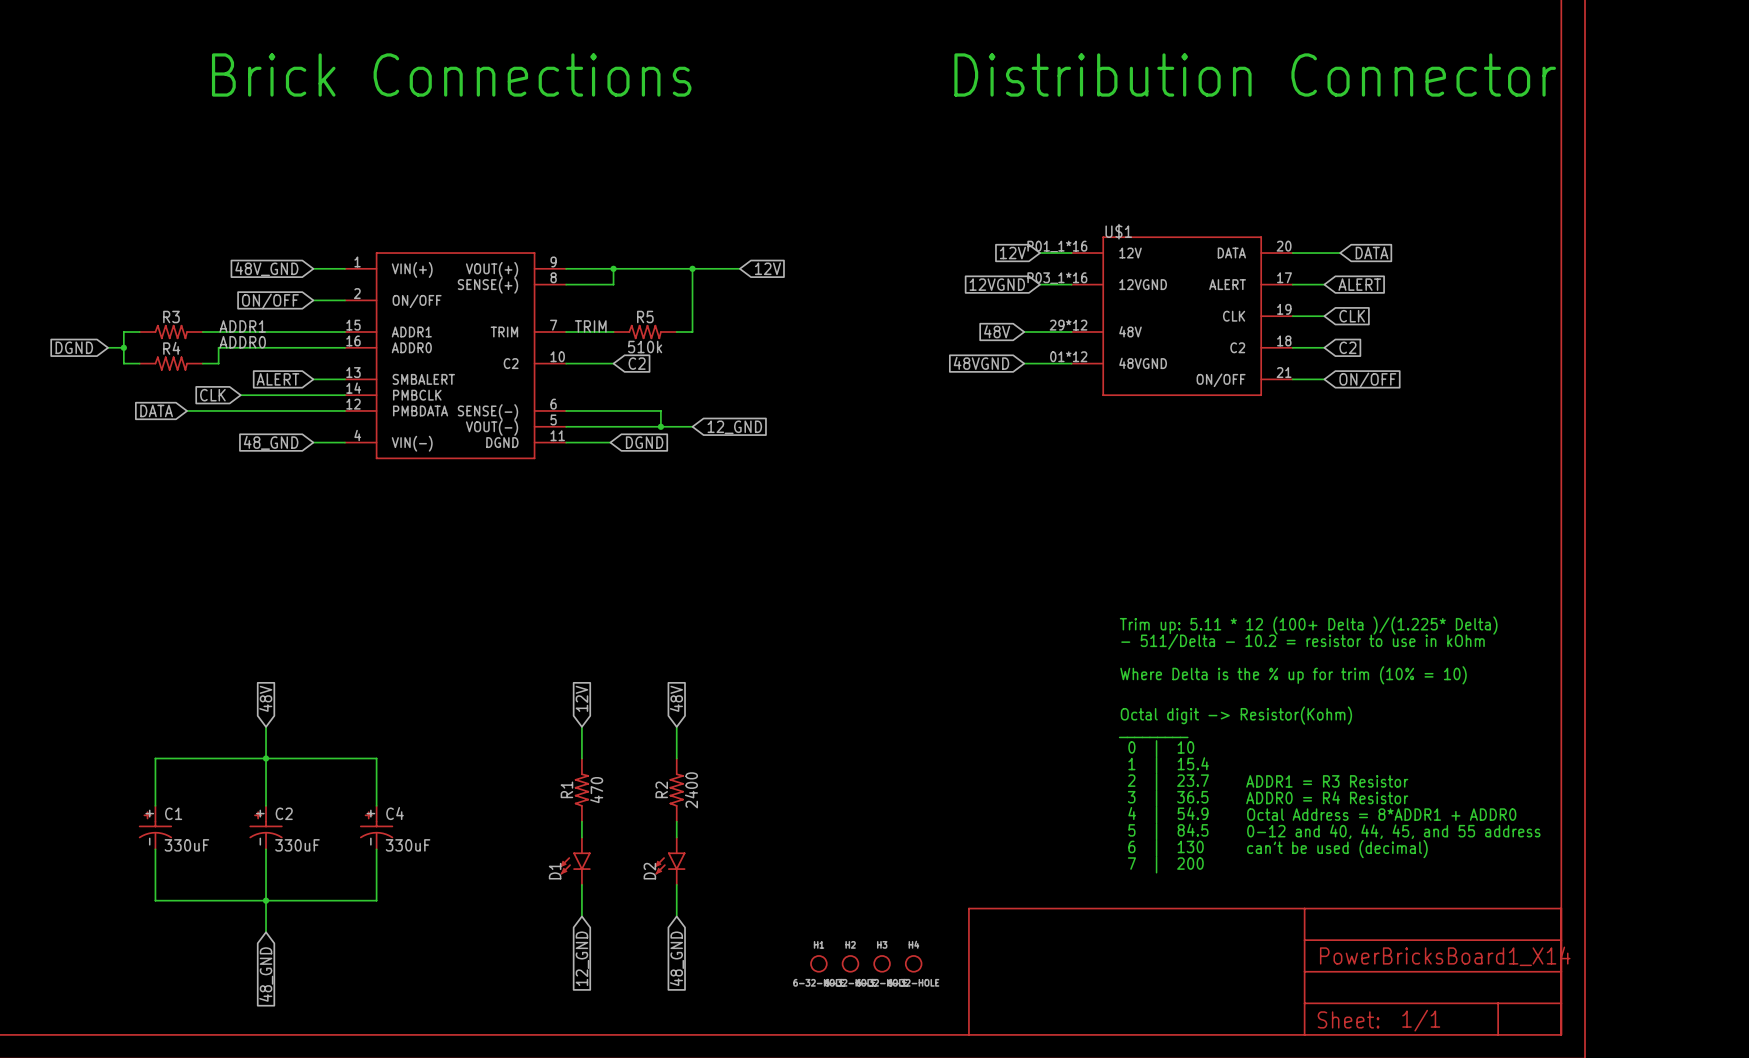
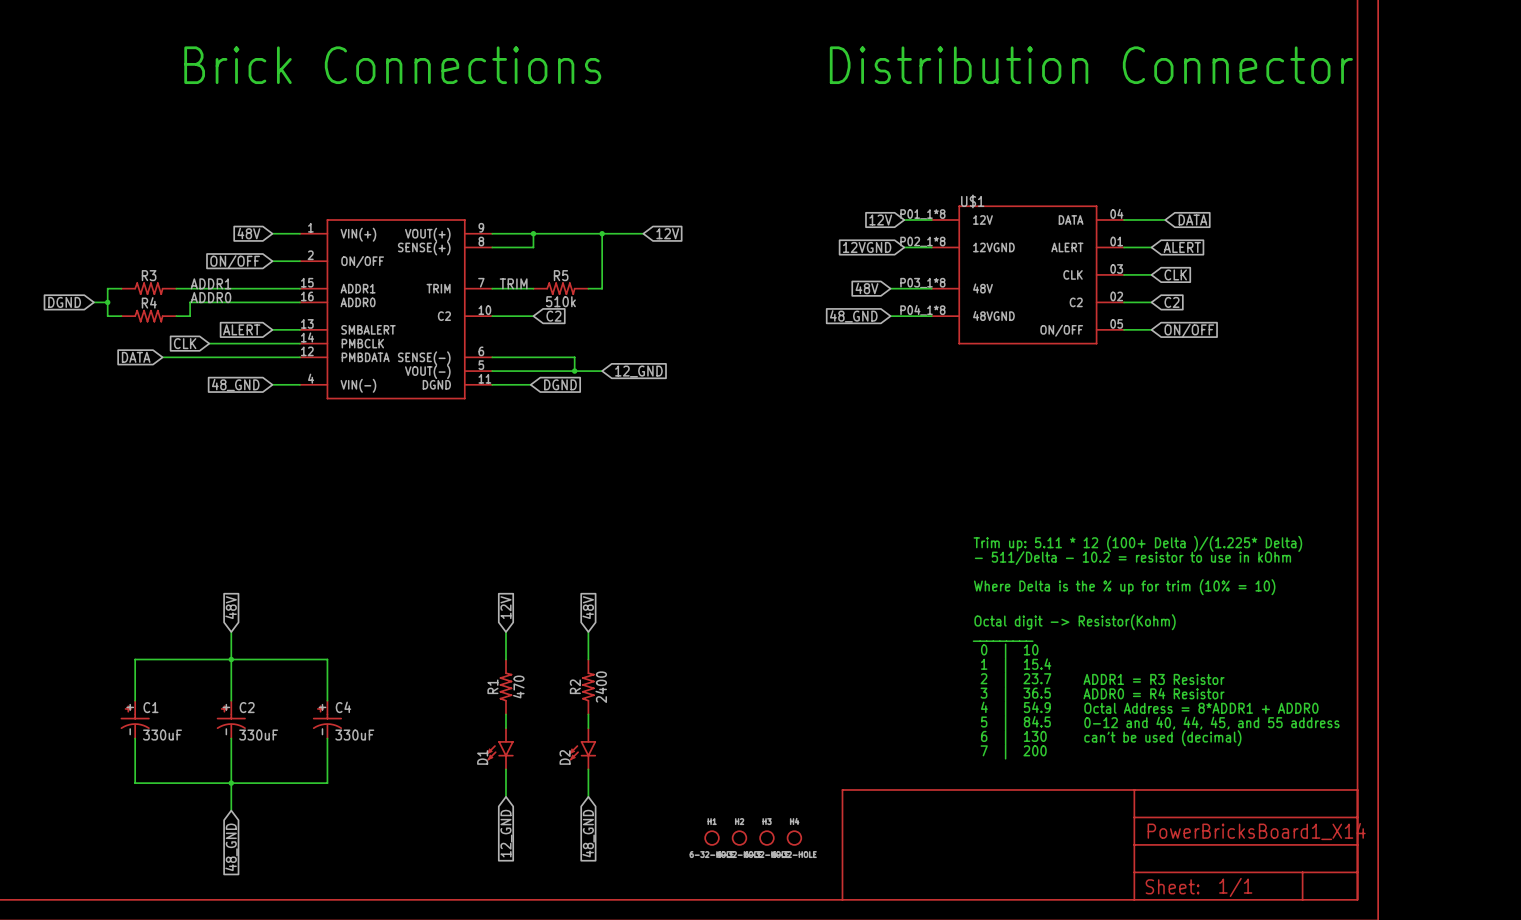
U$1 symbol: [1071, 236, 1293, 396] -> [931, 205, 1125, 345]
global label: 48V_GND (266, 269) -> 48V (248, 233)
global label: 48VGND (981, 363) -> 48_GND (853, 316)

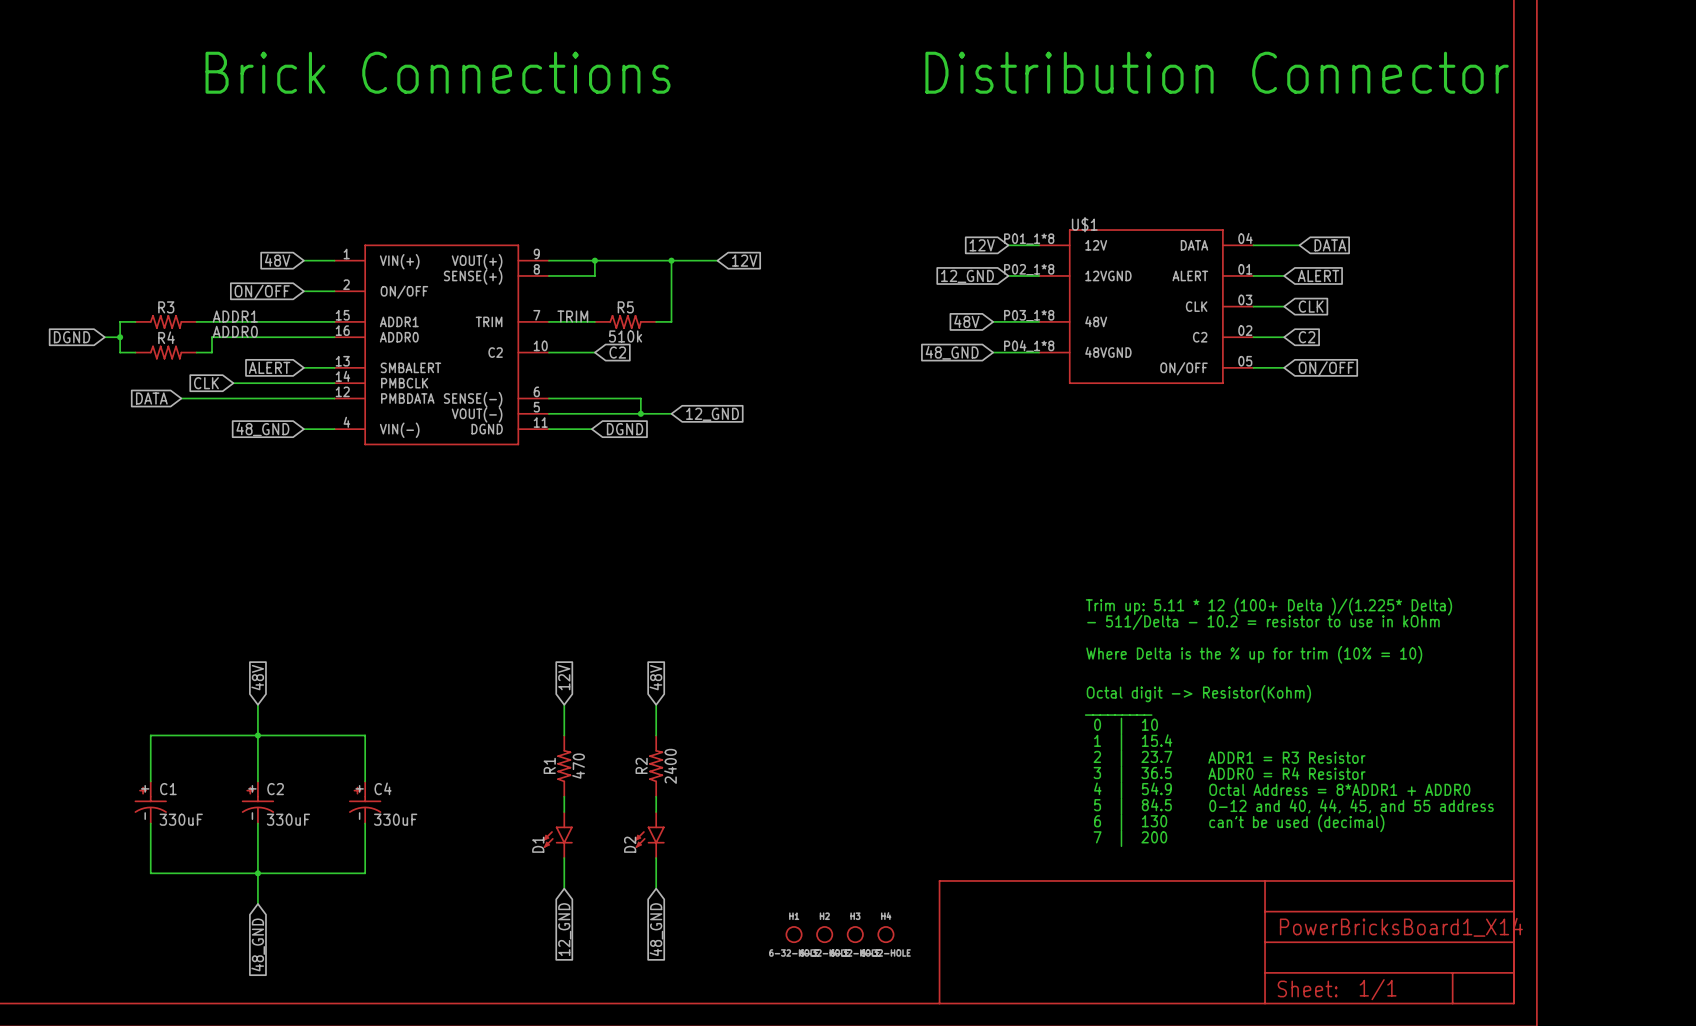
global label: 12VGND (867, 247) -> 12_GND (967, 276)

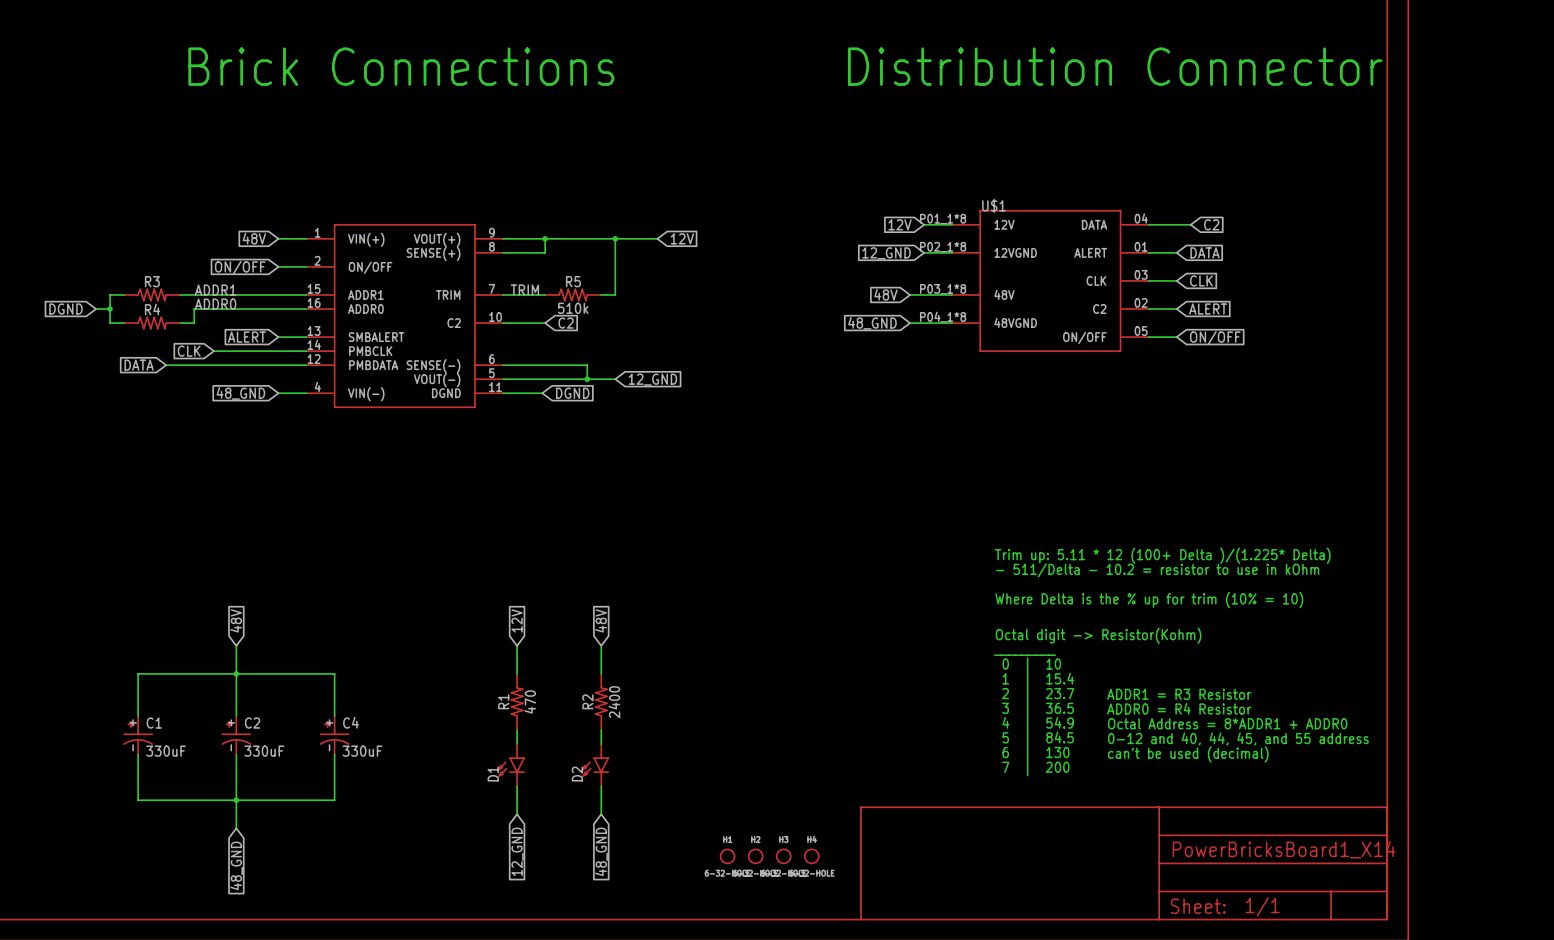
global label: DATA (1330, 245) -> C2 (1211, 224)
global label: ALERT (1318, 275) -> DATA (1205, 252)
global label: C2 (1307, 337) -> ALERT (1208, 309)

